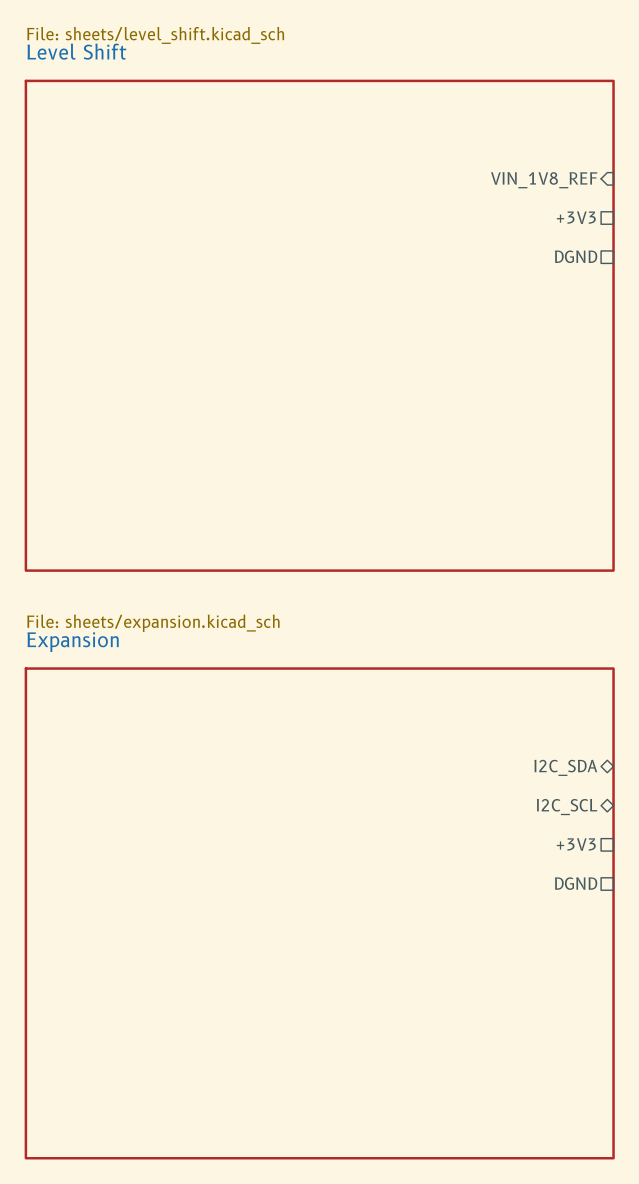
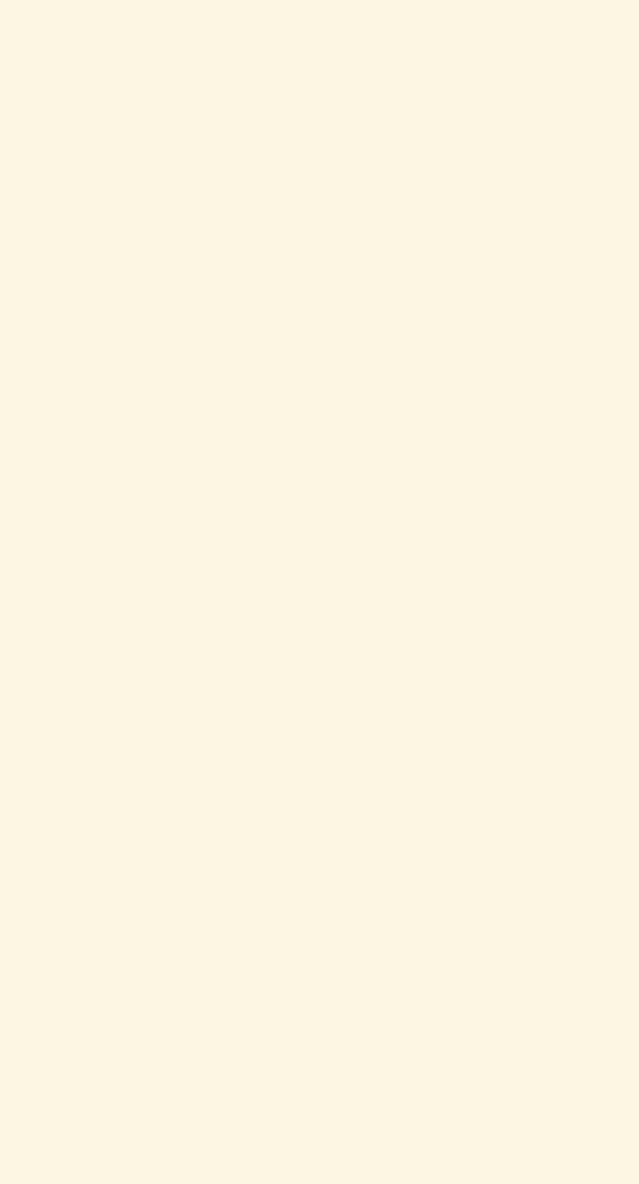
sheet pin: VIN_1V8_REF (544, 180) -> none
sheet pin: +3V3 (576, 217) -> none
sheet pin: DGND (576, 256) -> none
sheet Level Shift: File: sheets/level_shift.kicad_sch (319, 325) -> none
sheet pin: I2C_SDA (565, 767) -> none
sheet pin: I2C_SCL (567, 807) -> none
sheet pin: +3V3 (576, 844) -> none
sheet pin: DGND (576, 883) -> none
sheet Expansion: File: sheets/expansion.kicad_sch (319, 913) -> none

